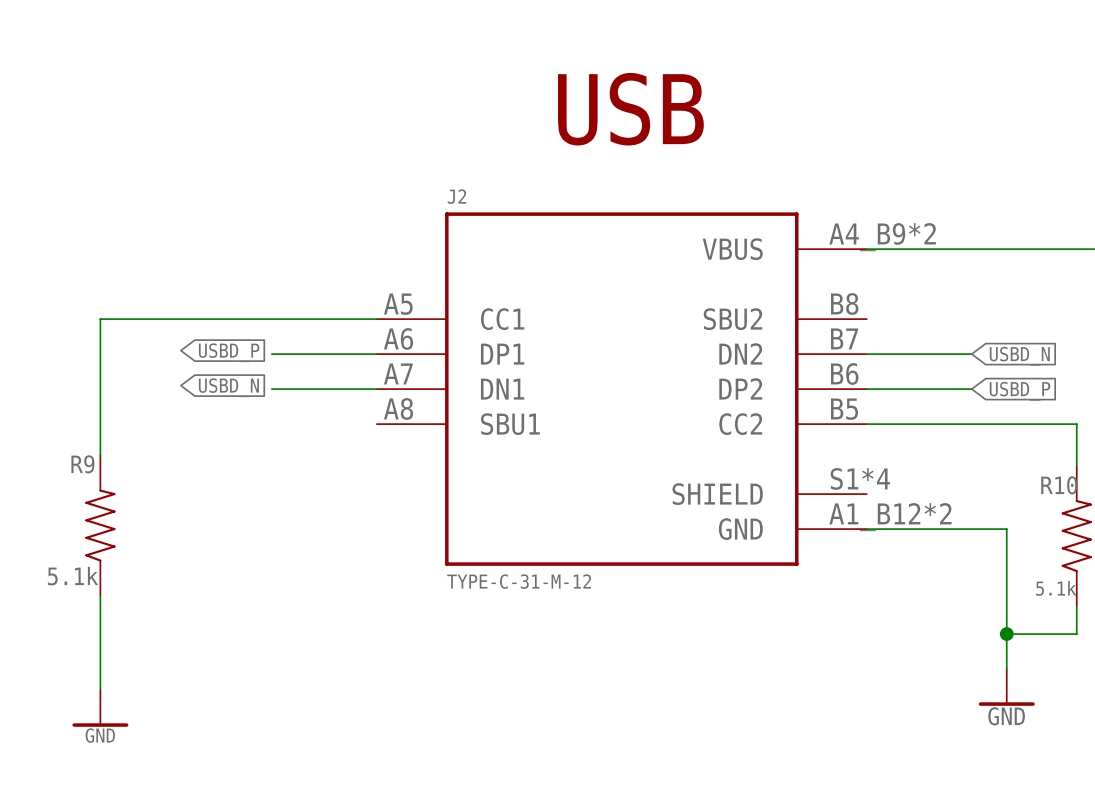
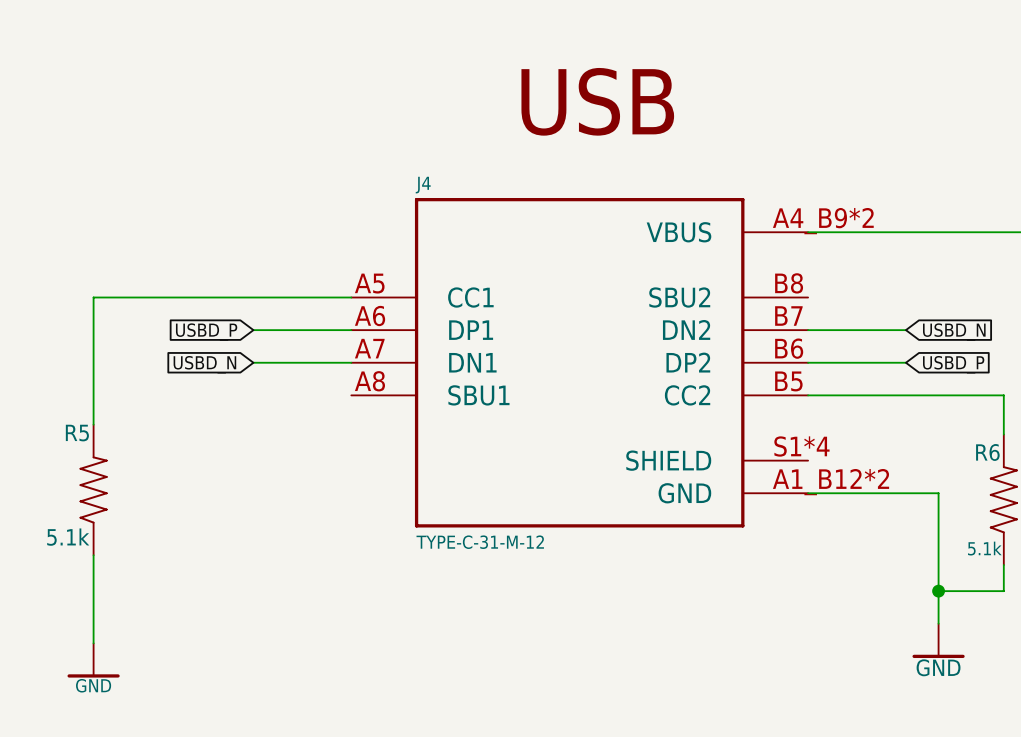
J2 name: J2 (456, 196) -> J4 (423, 185)
global label rotation: 0° (229, 352) -> 180° (206, 332)
global label rotation: 0° (228, 387) -> 180° (204, 364)
R9 name: R9 (82, 464) -> R5 (77, 433)
R10 name: R10 (1059, 485) -> R6 (987, 452)

